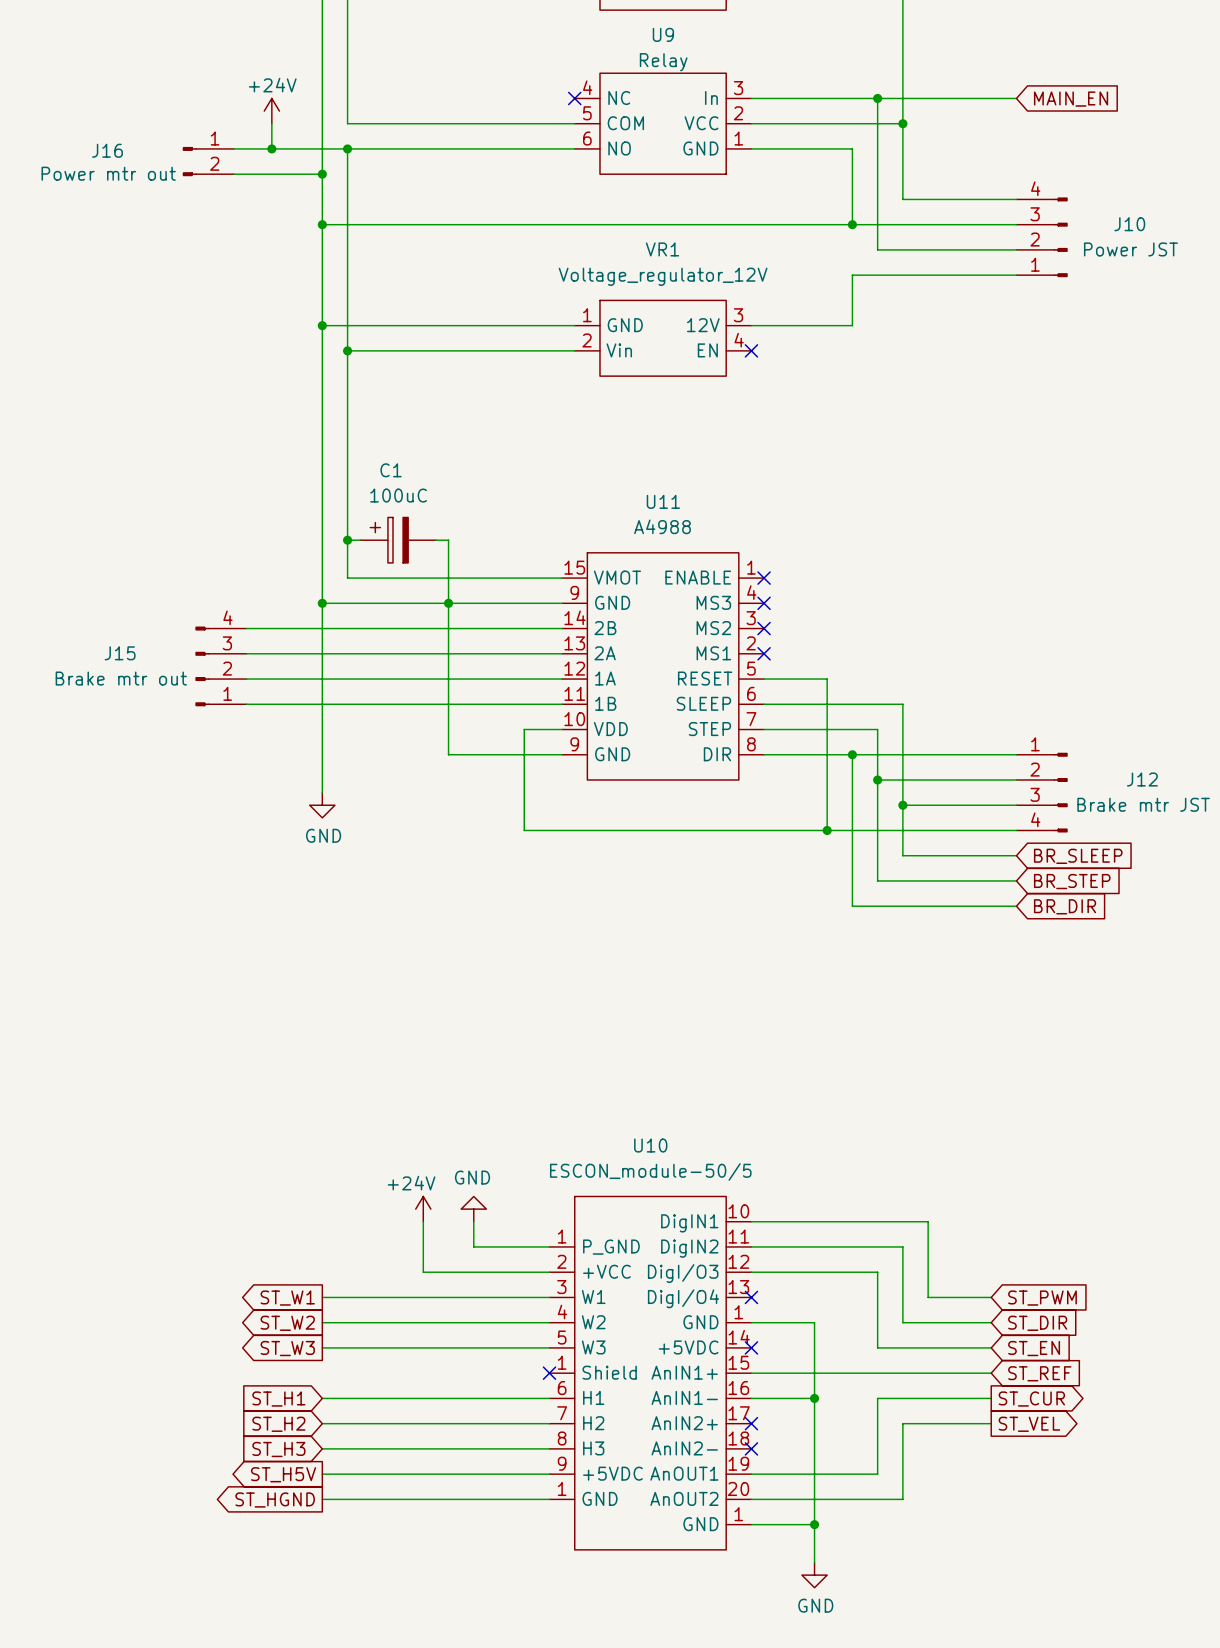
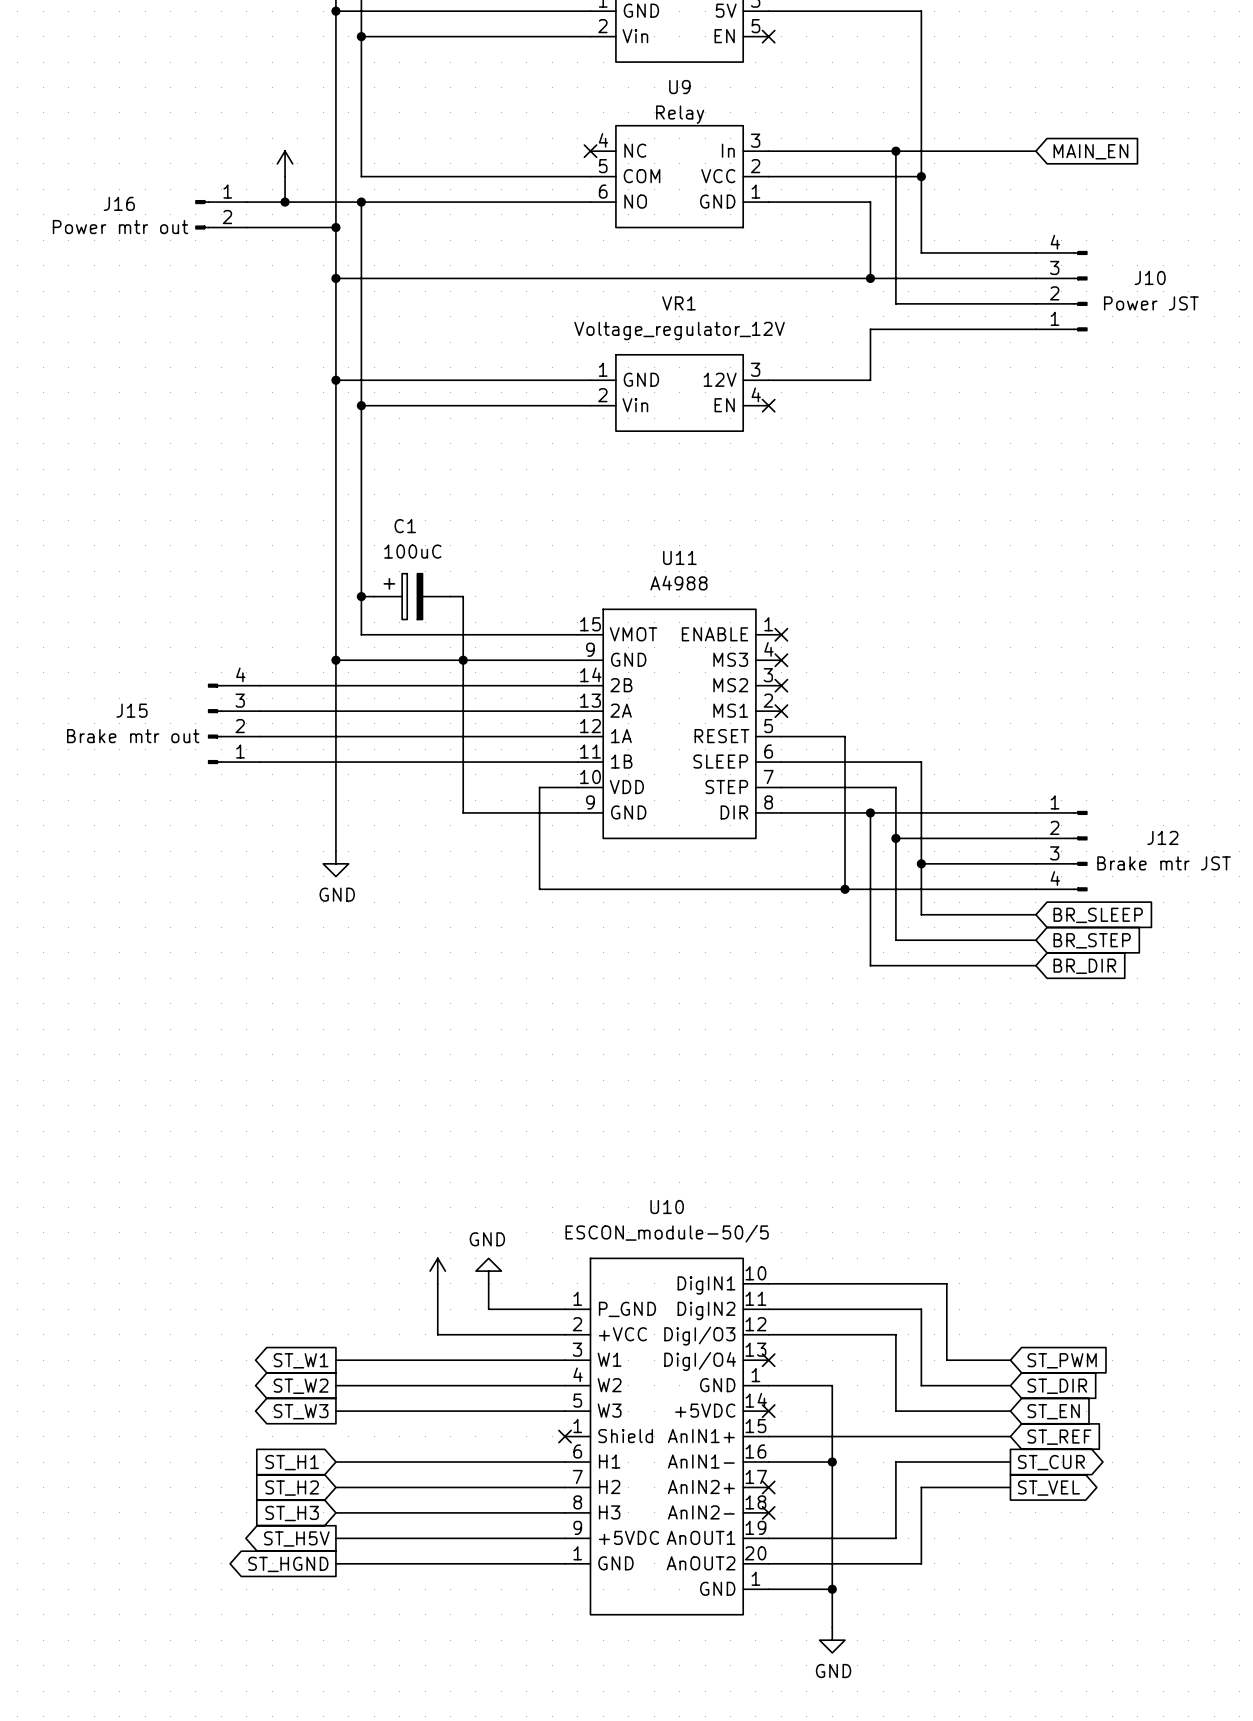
power symbol text: +24V (272, 85) -> none
power symbol text: +24V (411, 1183) -> none

